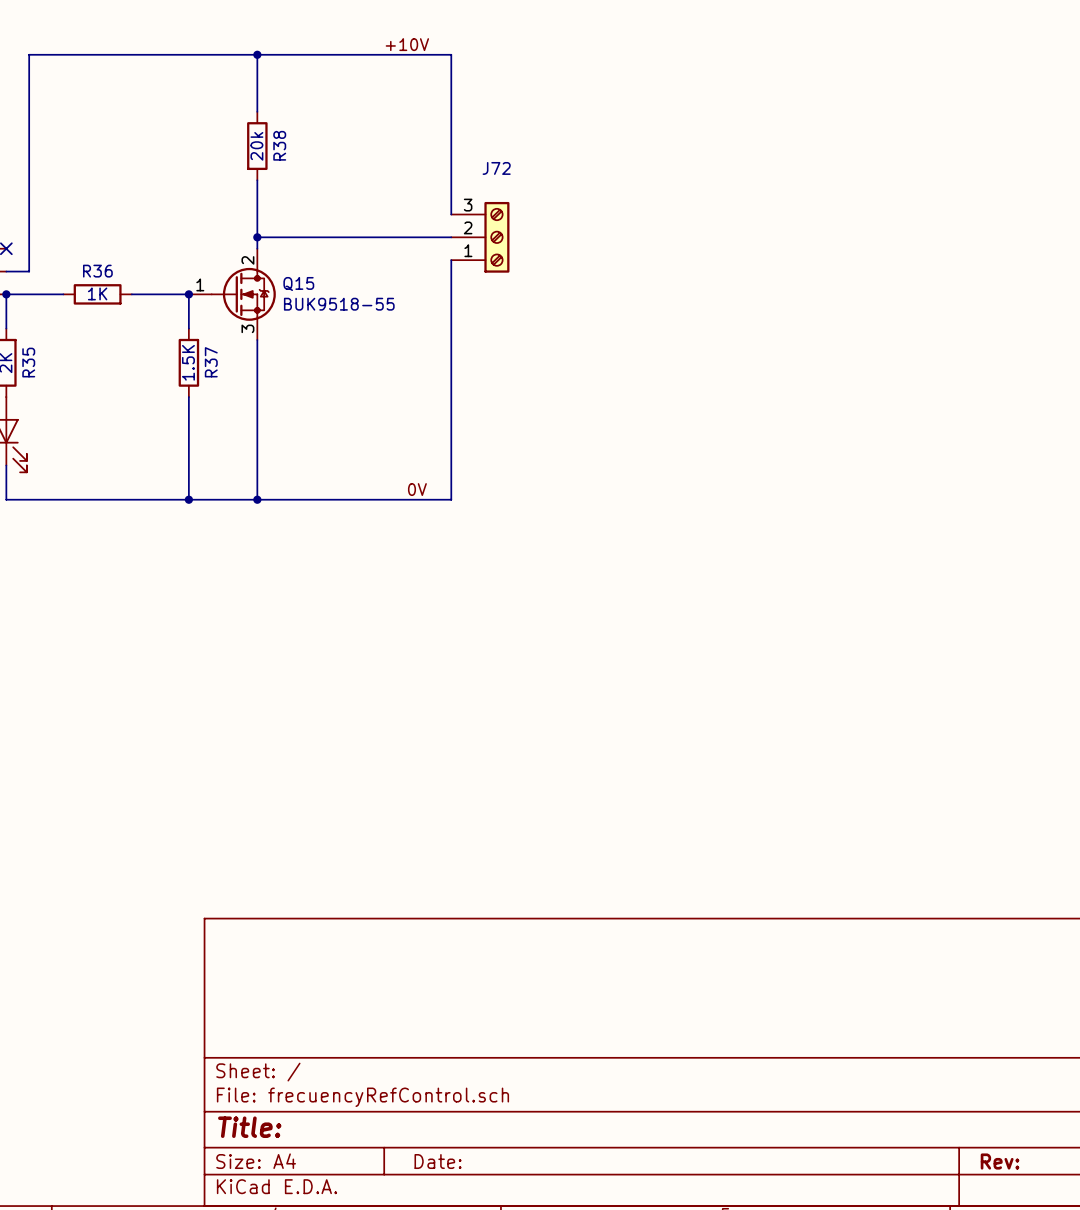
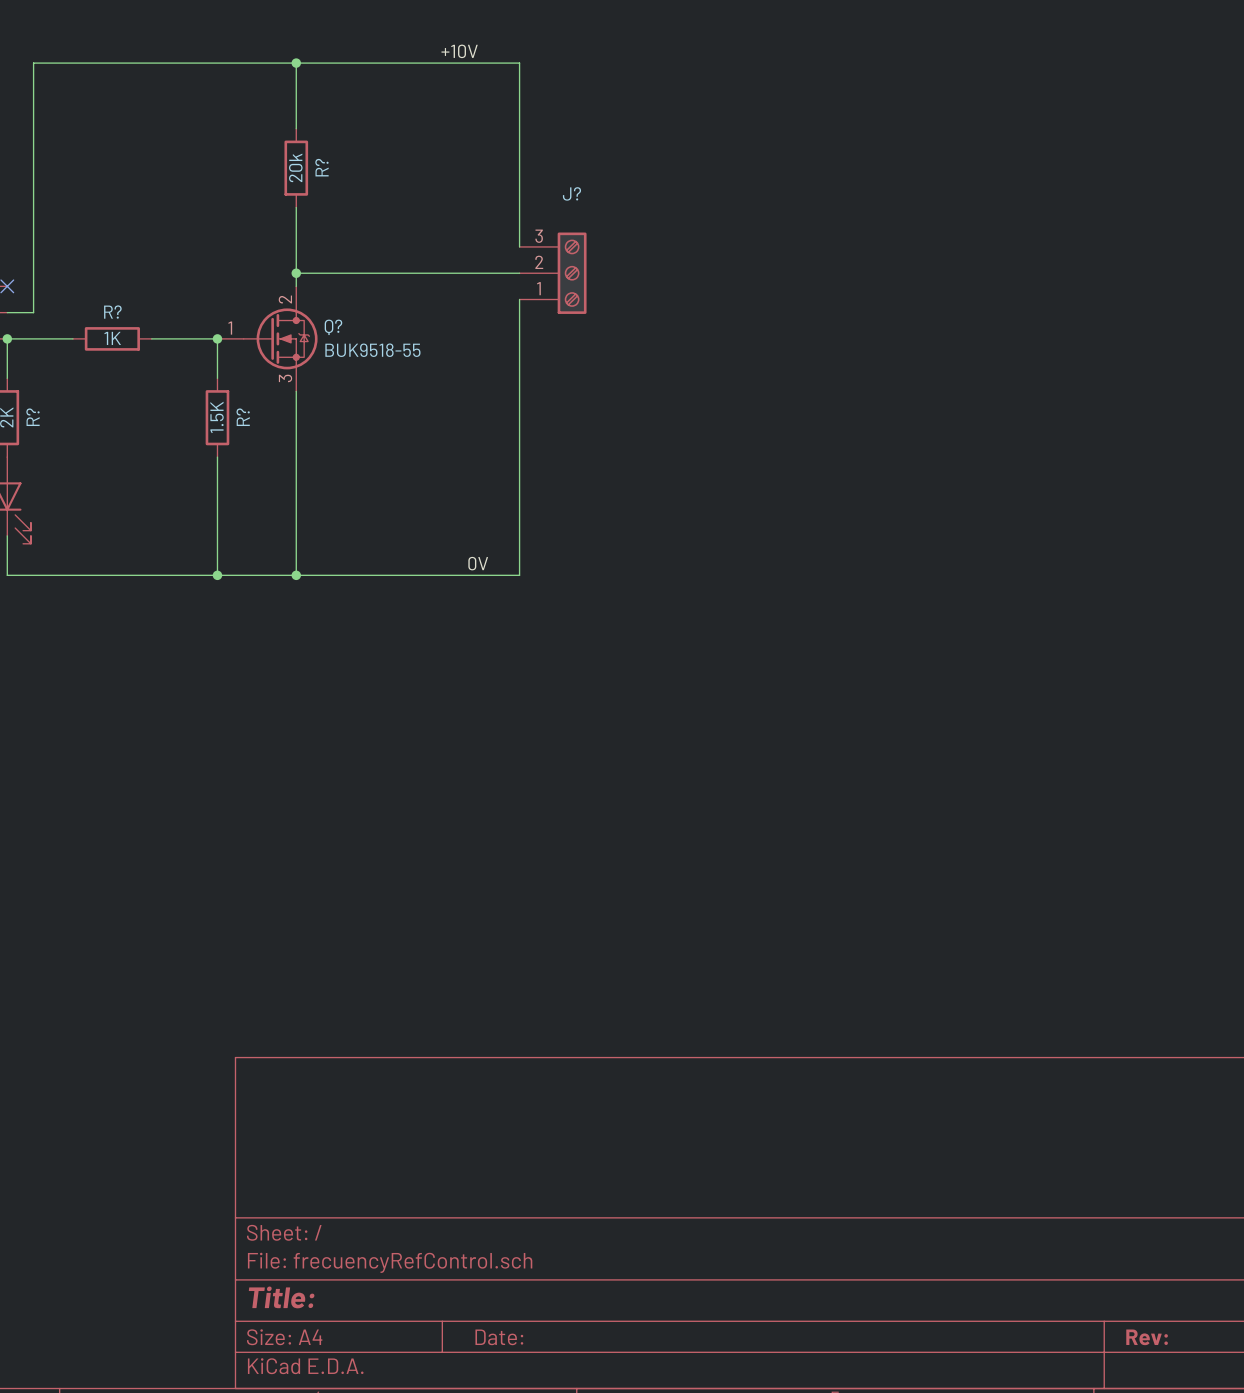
R38 name: R38 (279, 145) -> R? (321, 167)
J72 name: J72 (496, 168) -> J? (571, 193)
R36 name: R36 (97, 271) -> R? (112, 312)
Q15 name: Q15 (298, 283) -> Q? (333, 327)
R35 name: R35 (28, 362) -> R? (33, 417)
R37 name: R37 (211, 362) -> R? (243, 417)

